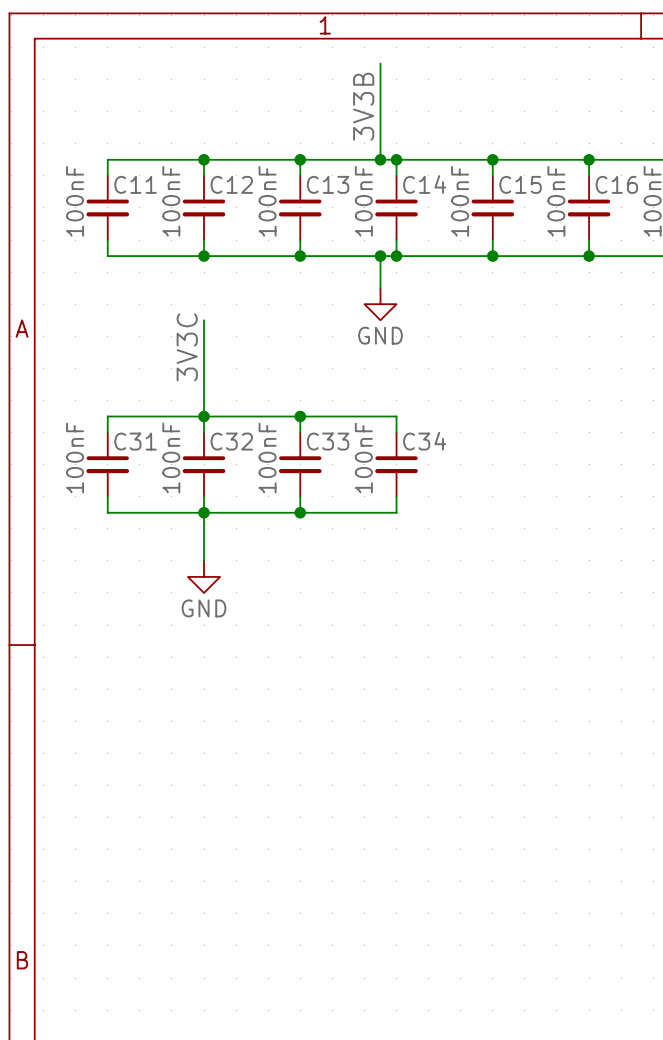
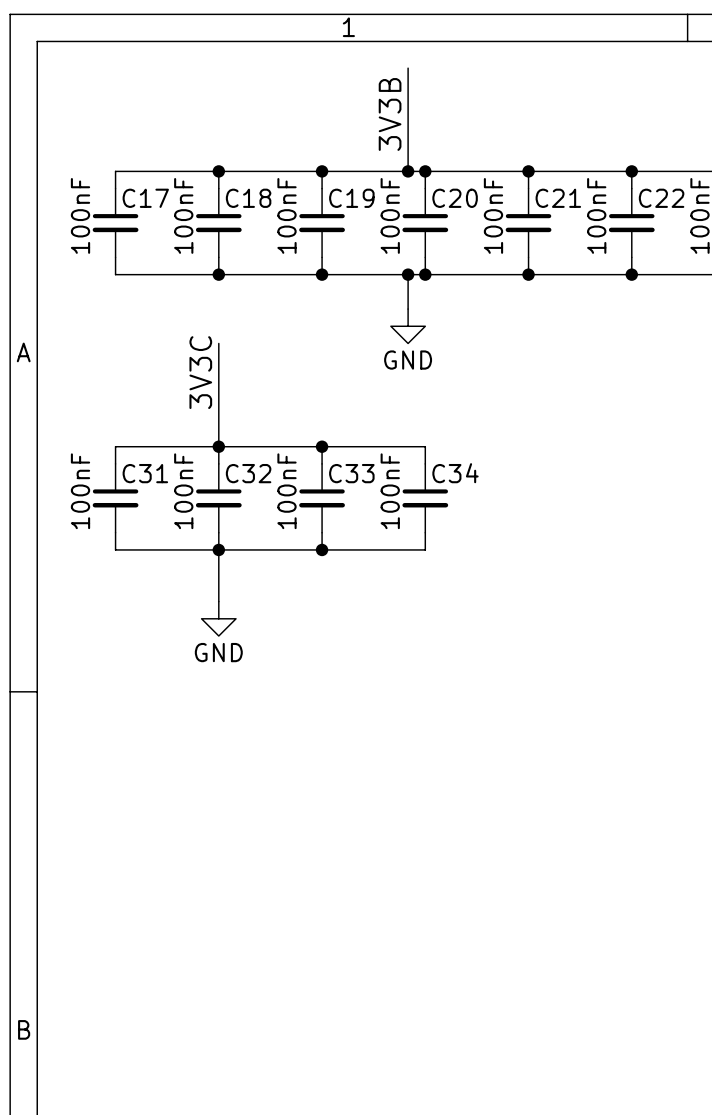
C11 name: C11 (135, 184) -> C17 (145, 198)
C12 name: C12 (231, 184) -> C18 (248, 198)
C13 name: C13 (328, 184) -> C19 (351, 198)
C14 name: C14 (424, 184) -> C20 (455, 198)
C15 name: C15 (520, 184) -> C21 (558, 198)
C16 name: C16 (616, 184) -> C22 (661, 198)

